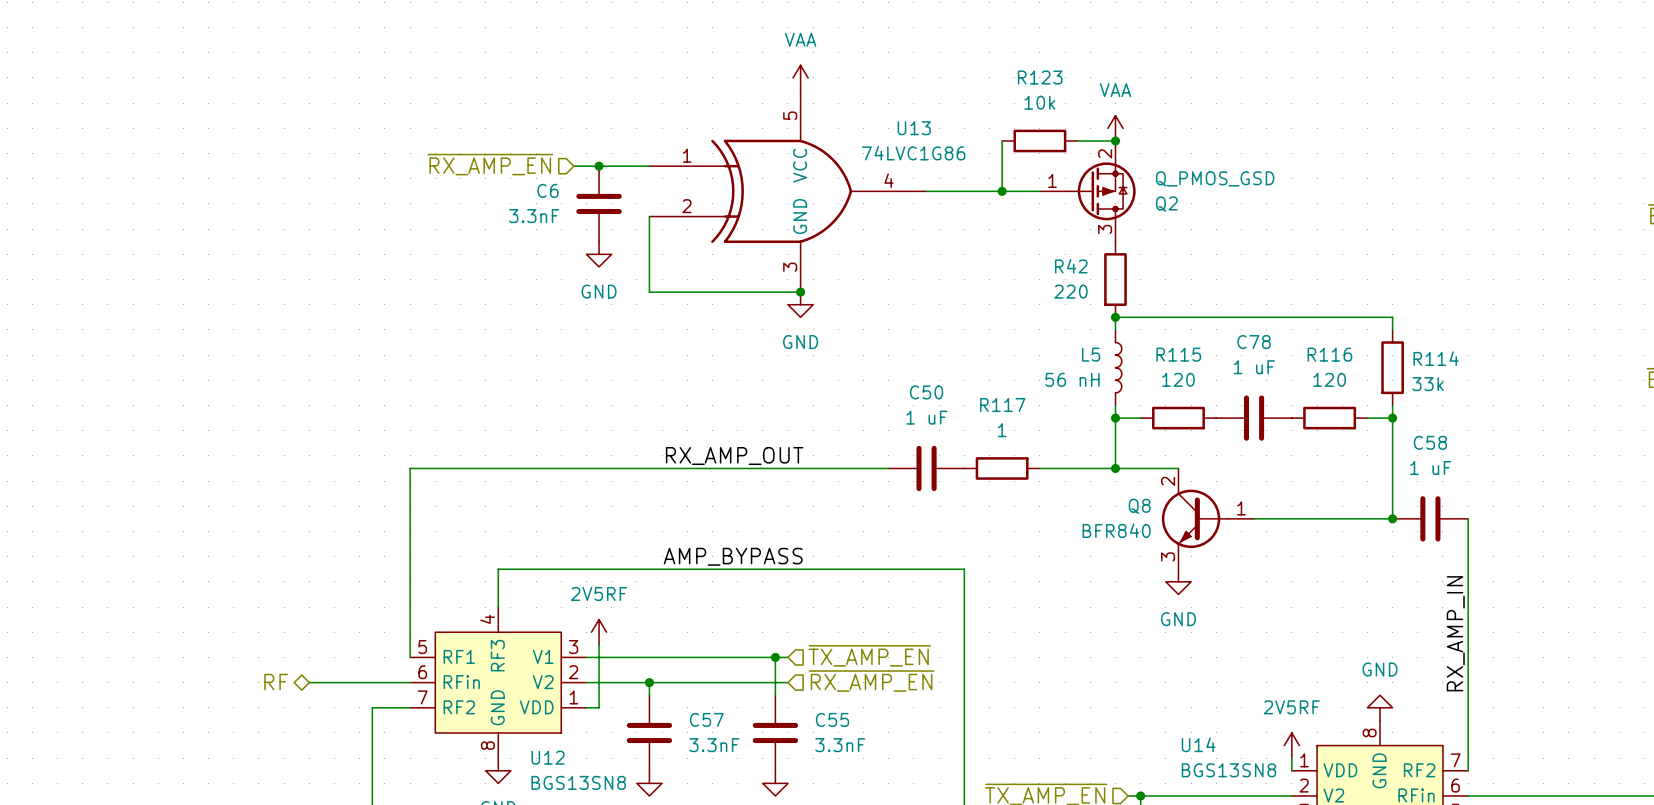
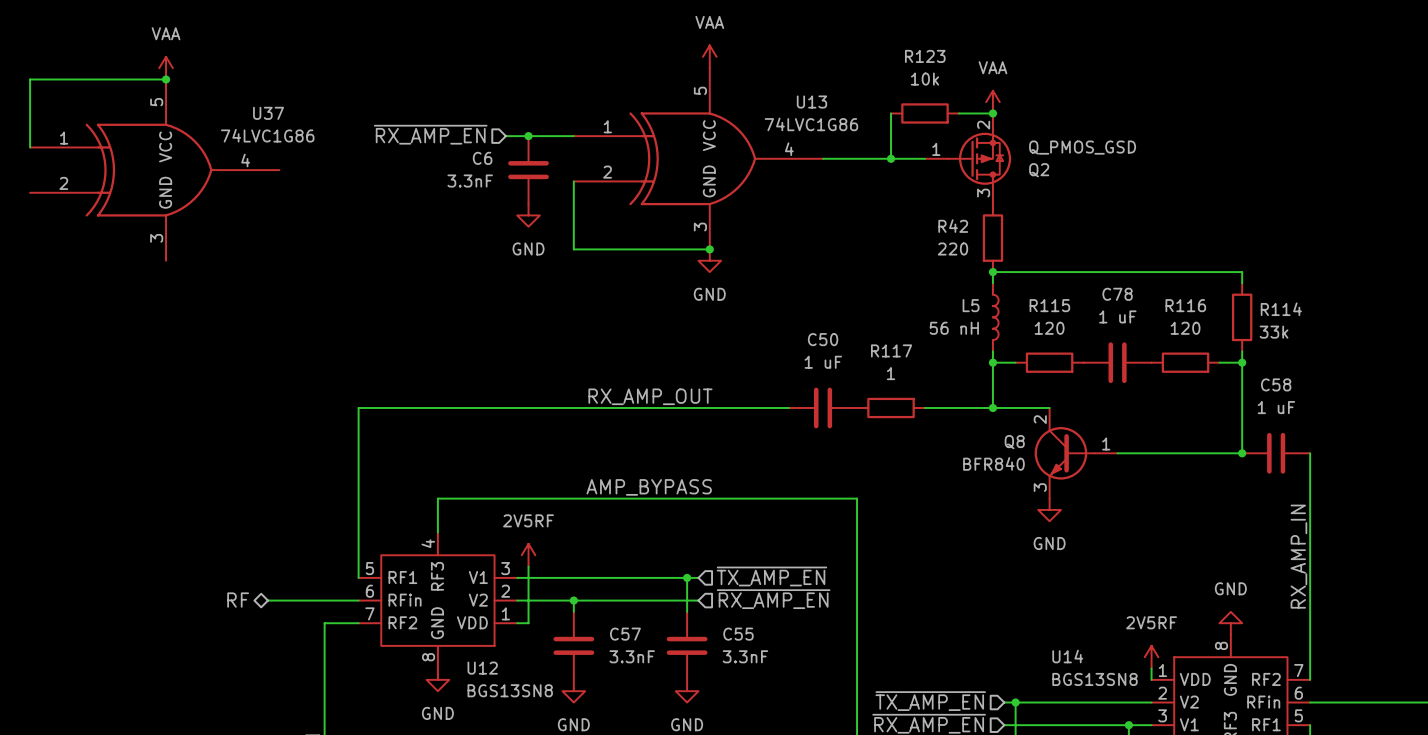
power symbol: none -> VAA (166, 68)
wire: none -> (166, 79) (30, 79) (30, 147)
junction: none -> (166, 79)
U37: none -> 74LVC1G86 (154, 170)

